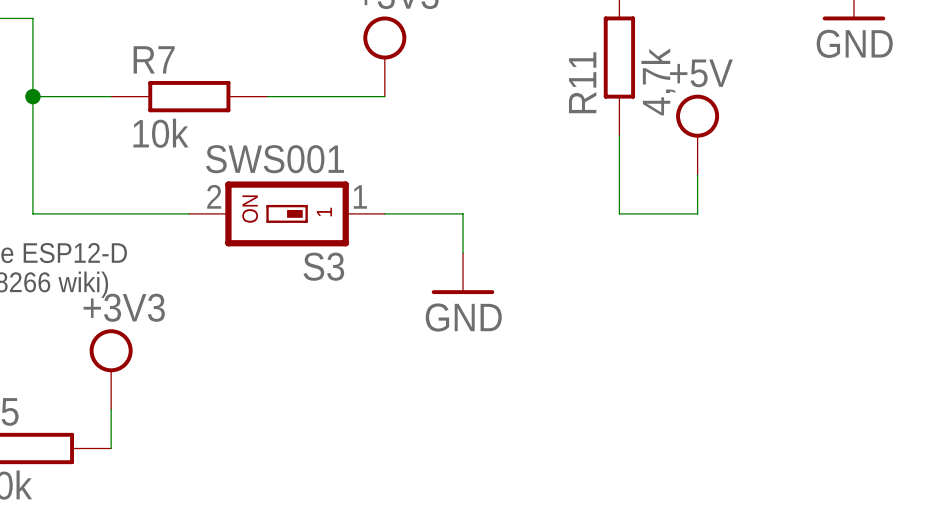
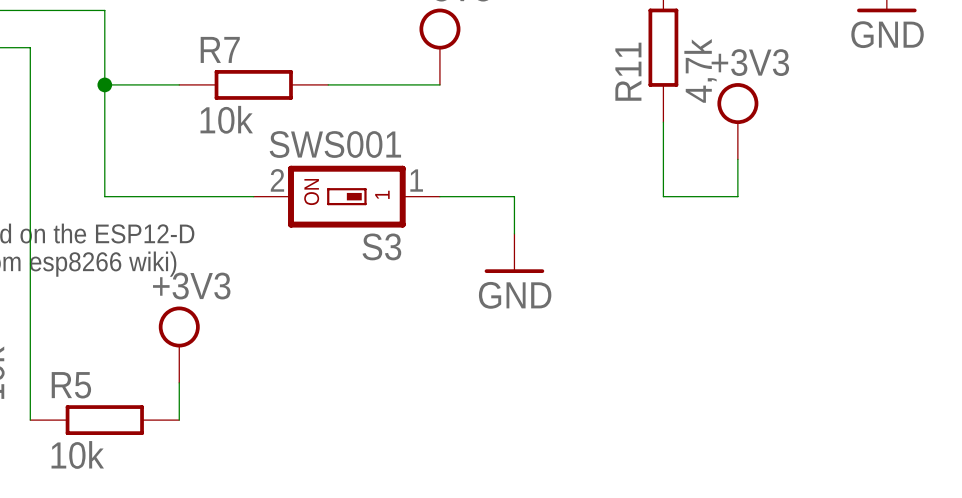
power symbol: +5V (697, 134) -> +3V3 (737, 121)

